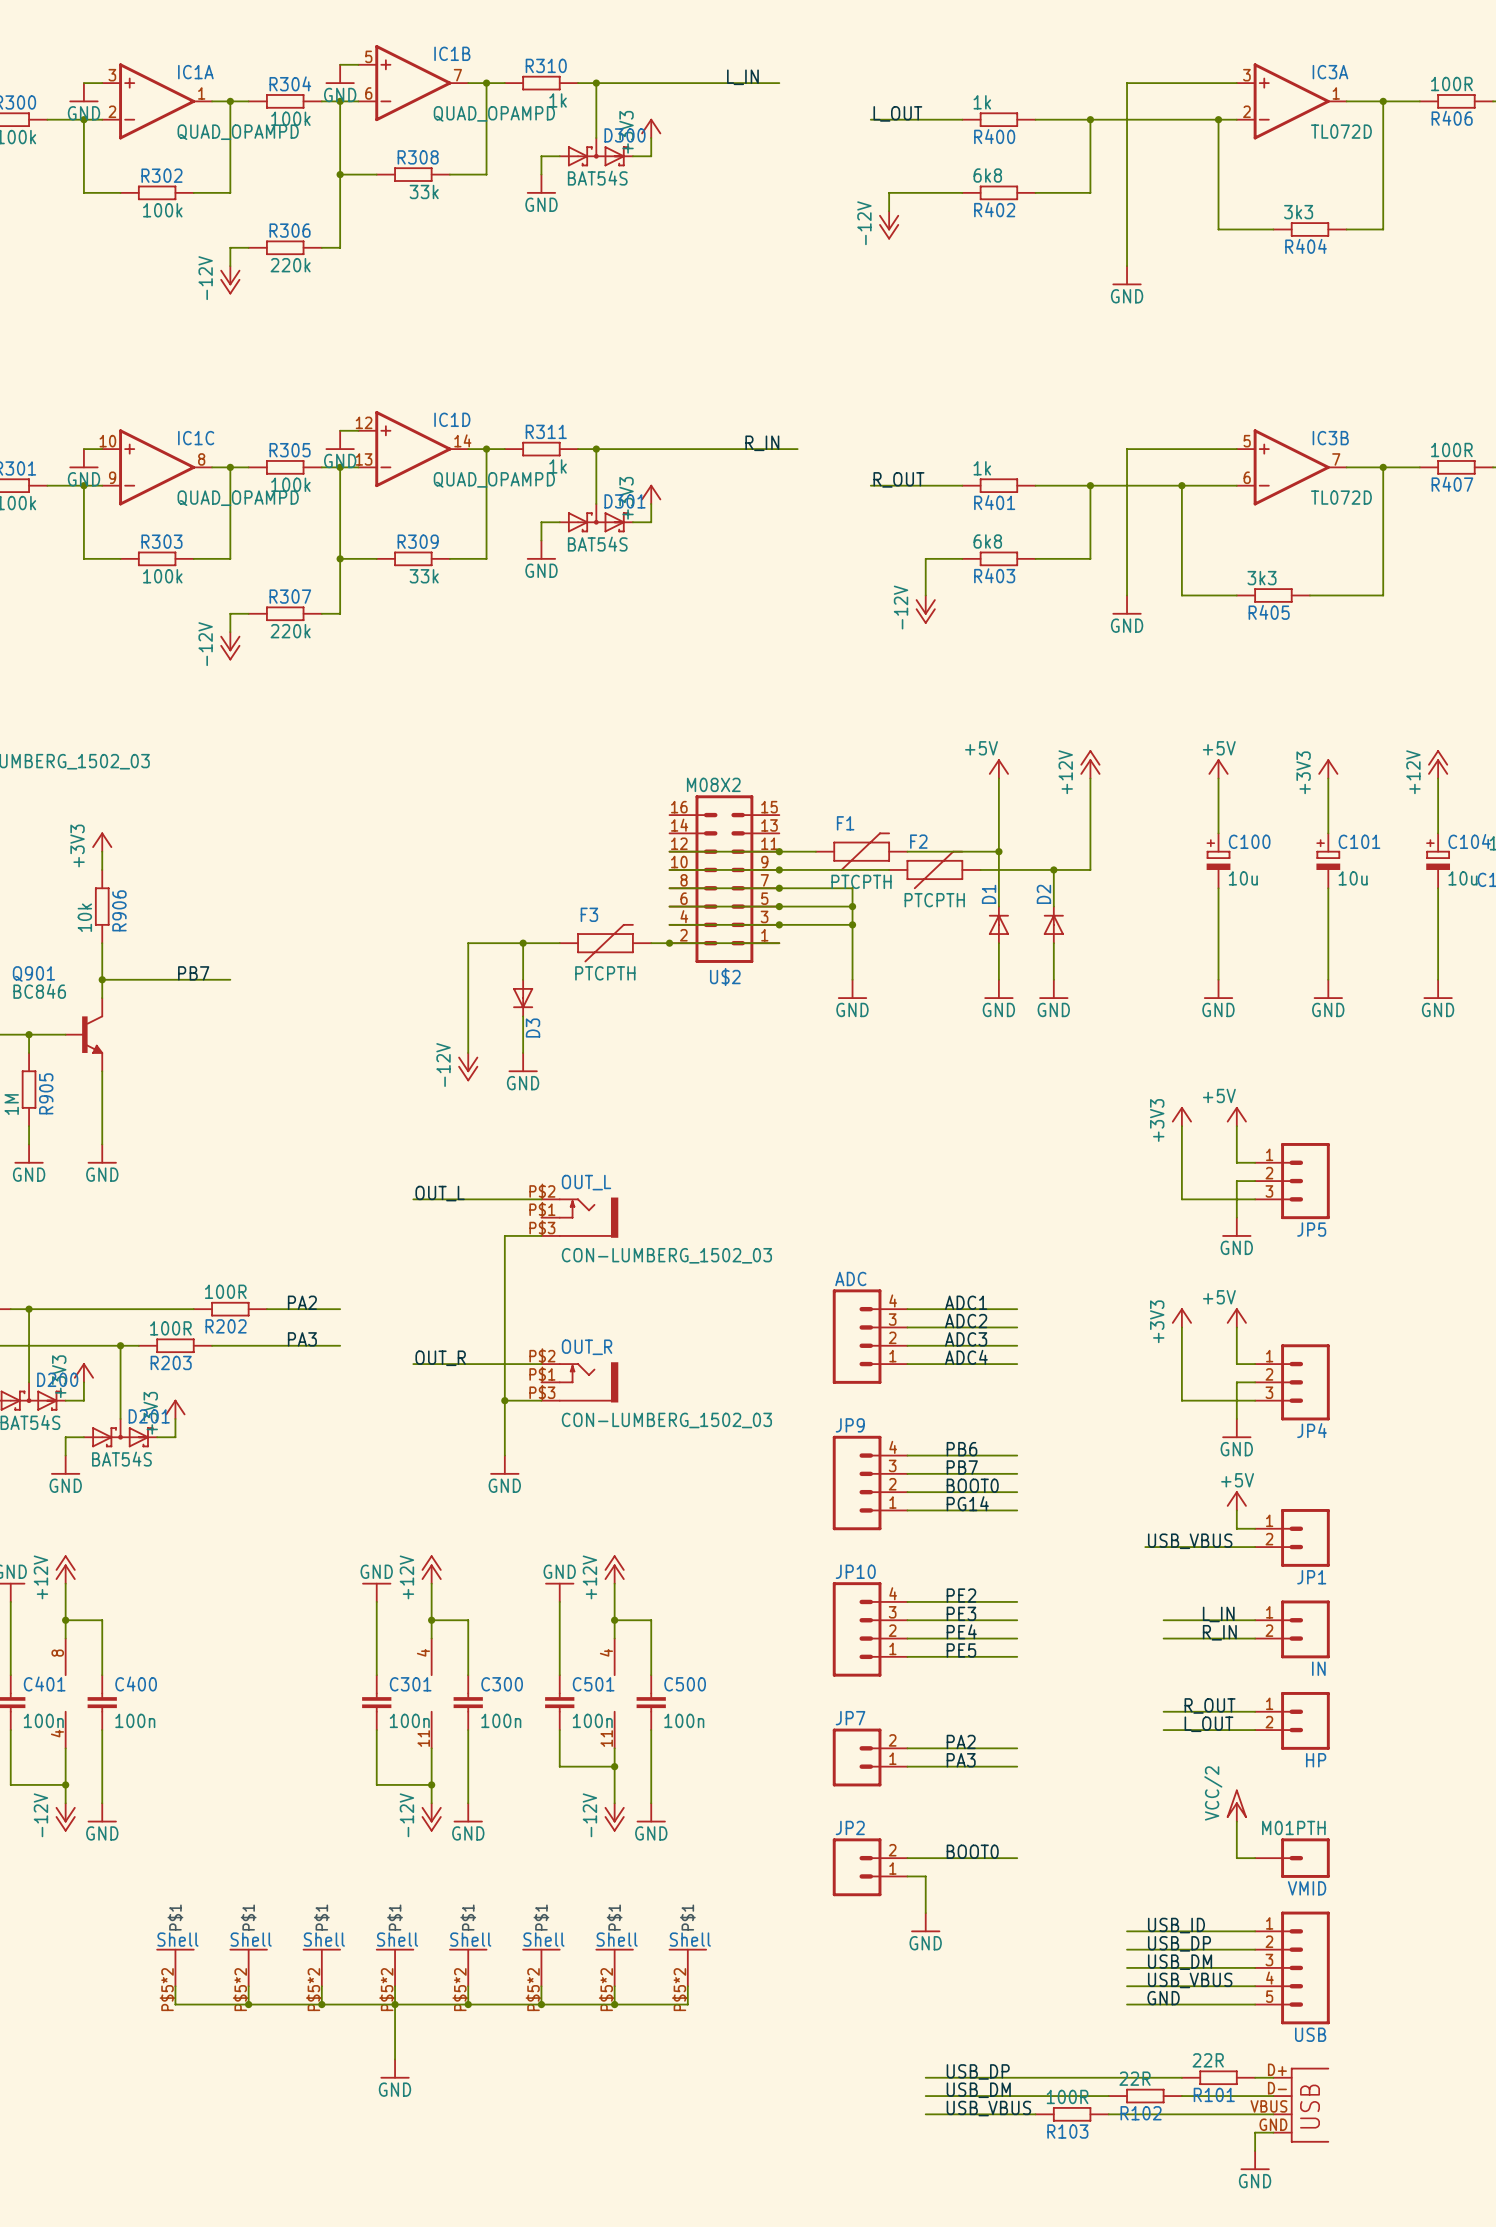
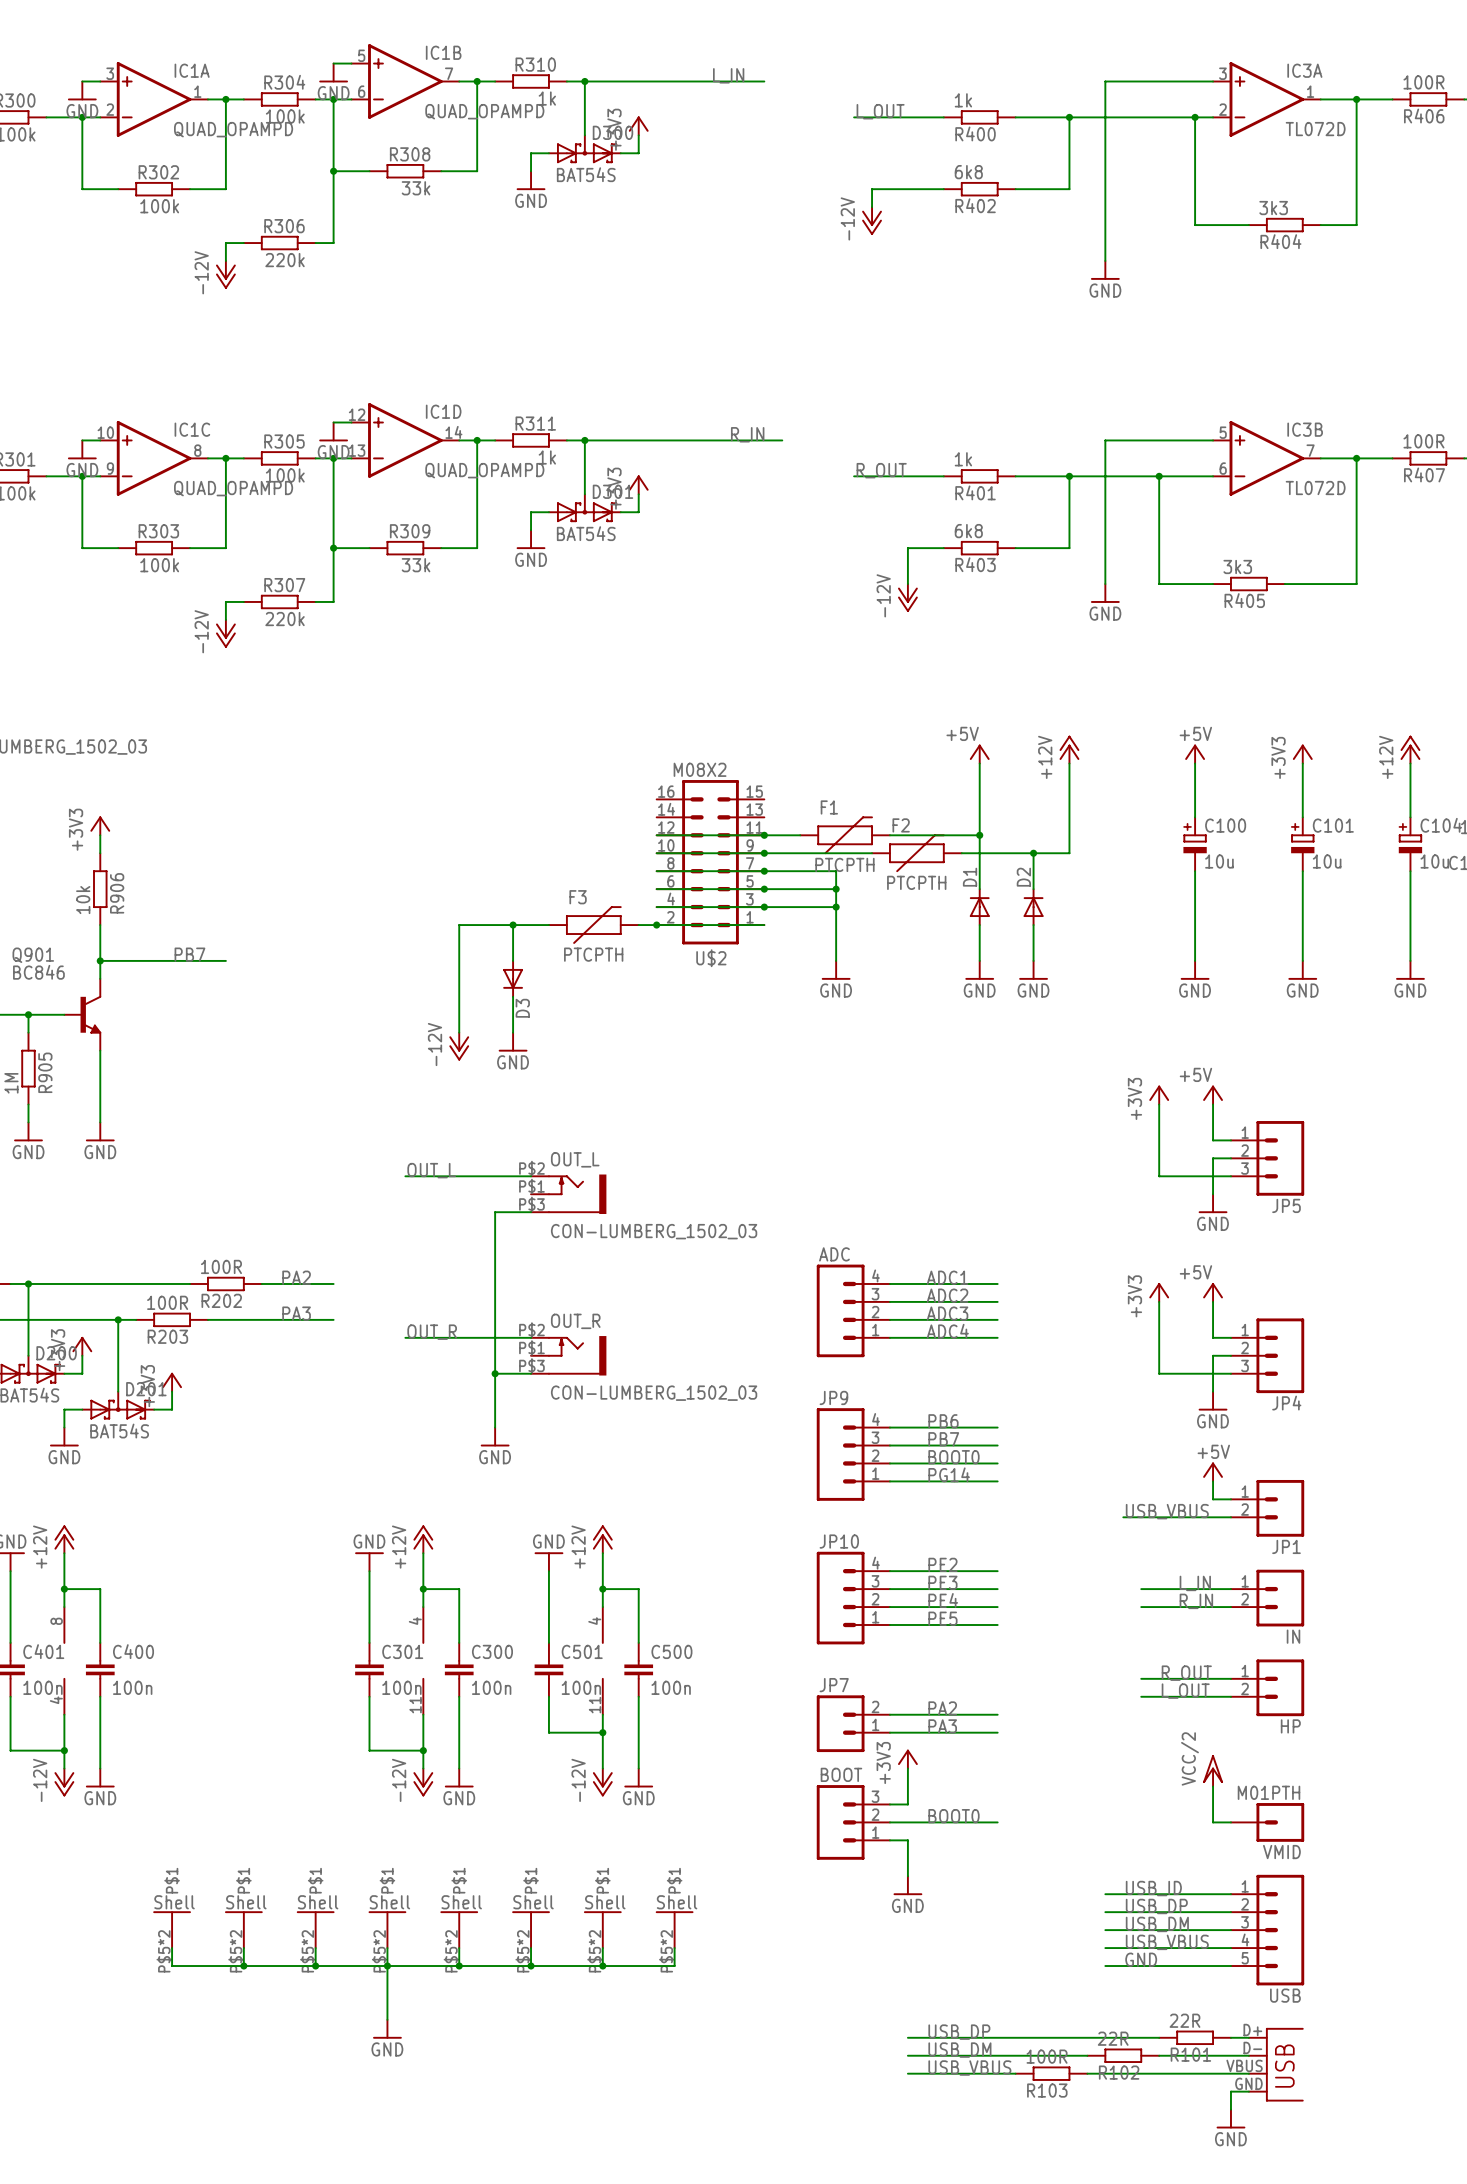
power symbol: none -> +3V3 (907, 1759)
wire: none -> (907, 1768) (907, 1804) (889, 1804)
BOOT: none -> (853, 1822)
JP2: (870, 1867) -> none

